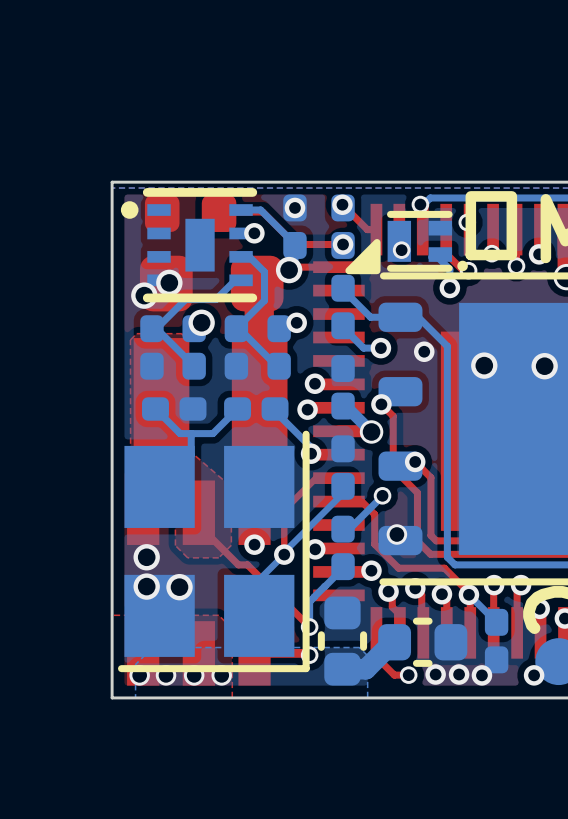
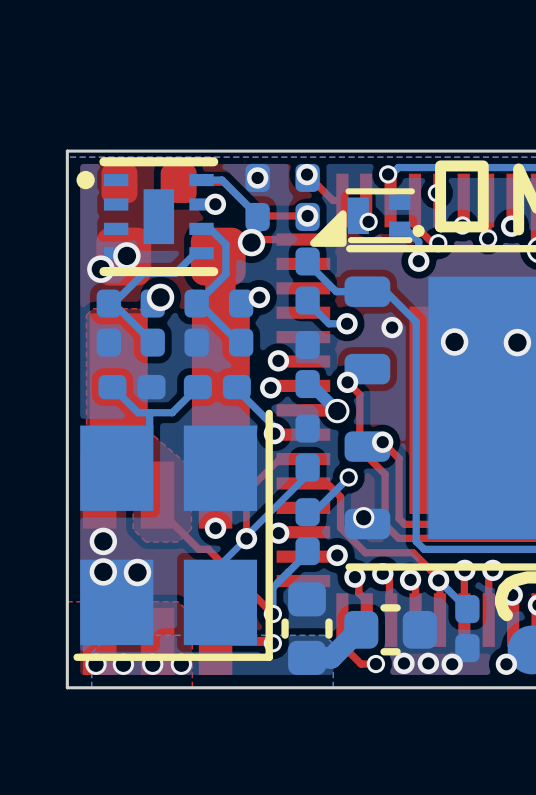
part footprint: [387, 210, 468, 272] -> [345, 188, 425, 244]

